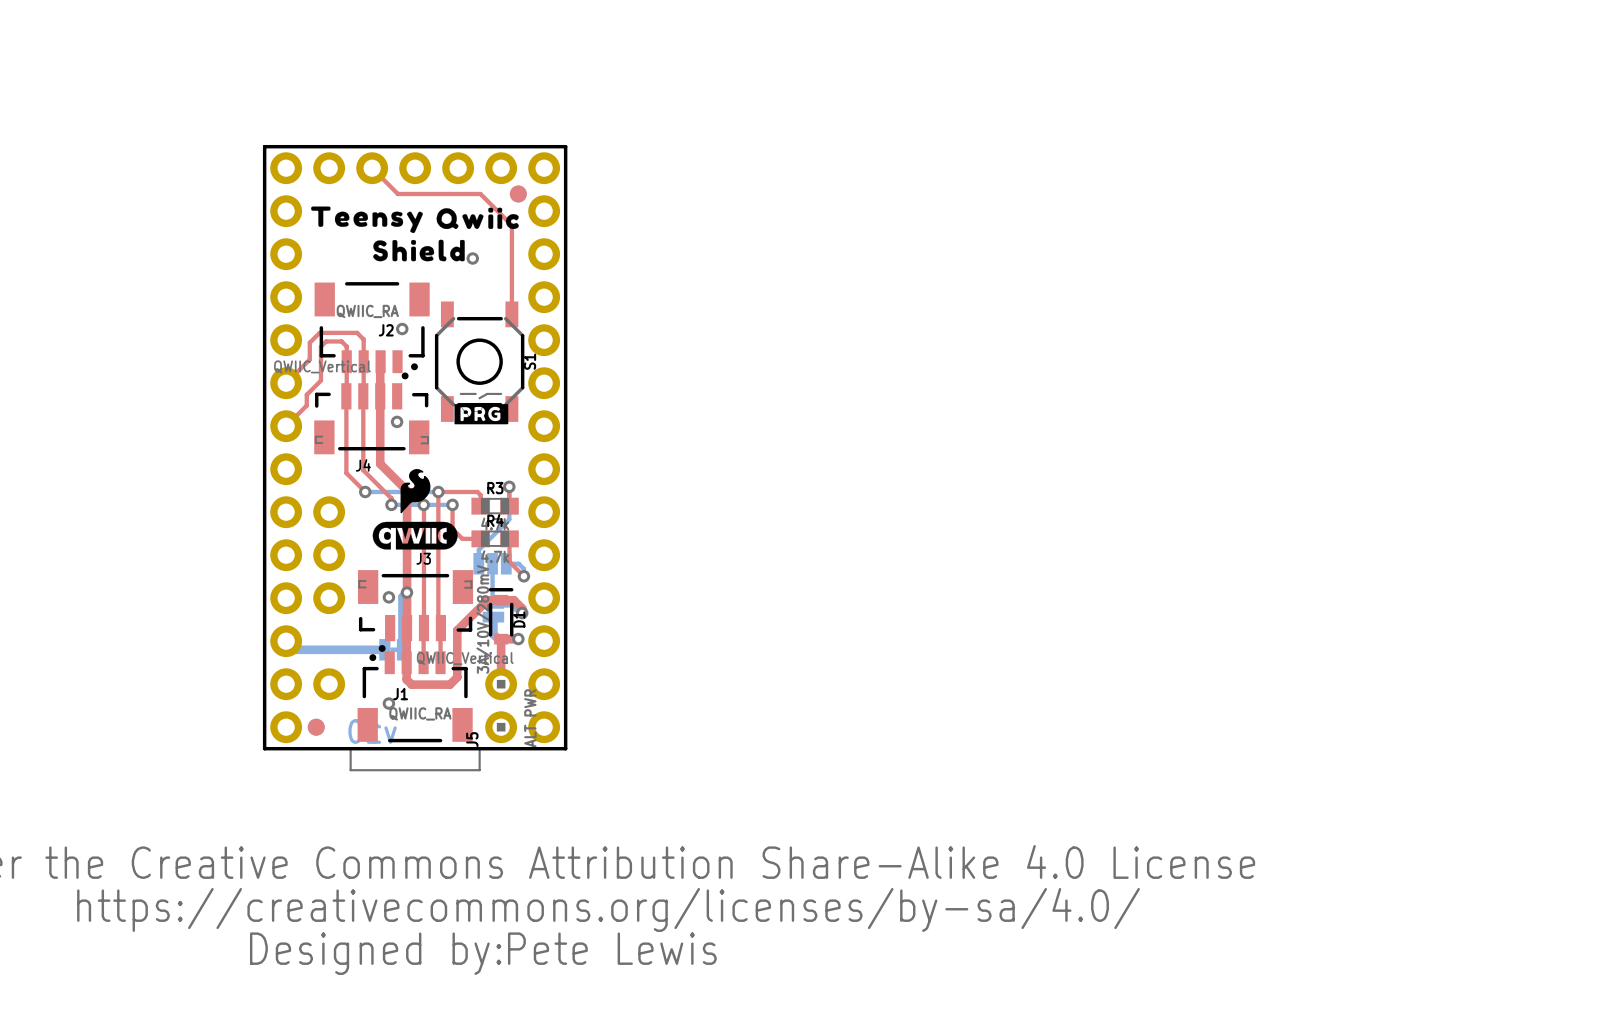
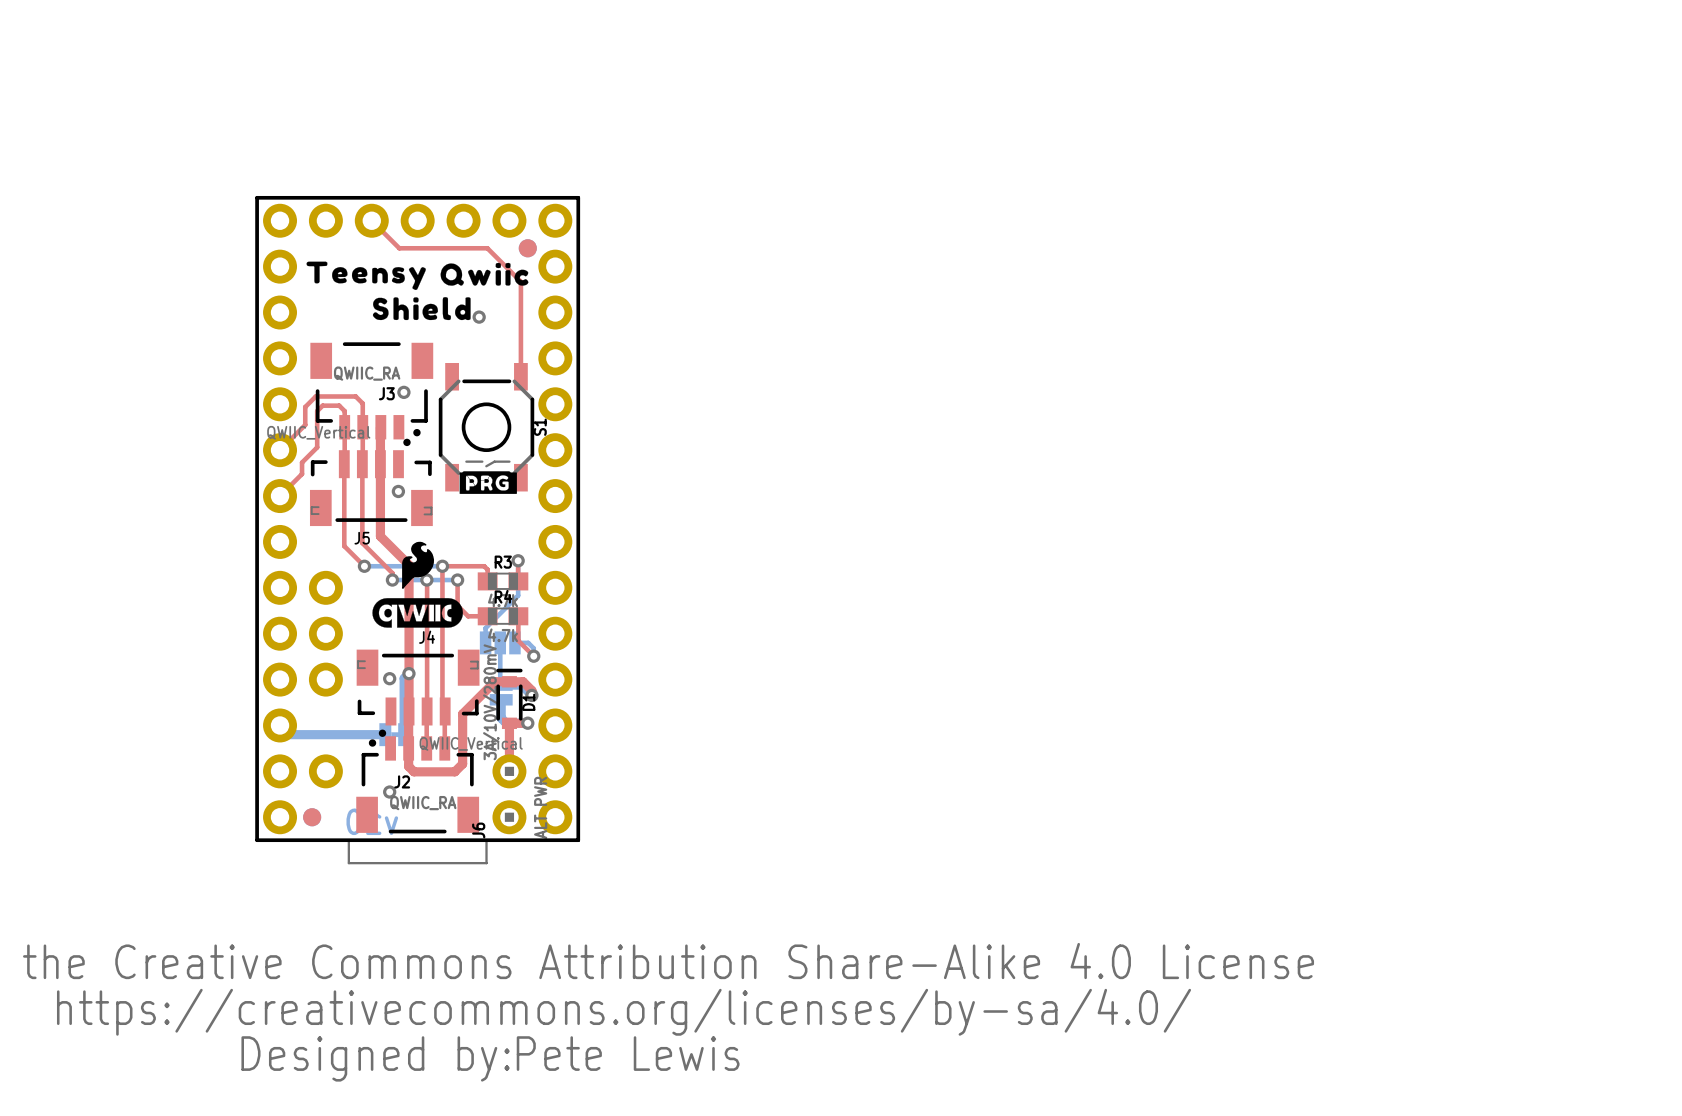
J2 name: J2 (386, 330) -> J3 (386, 393)
J4 name: J4 (363, 465) -> J5 (362, 538)
J3 name: J3 (423, 558) -> J4 (427, 637)
J1 name: J1 (400, 694) -> J2 (402, 781)
J5 name: J5 (472, 739) -> J6 (478, 830)

